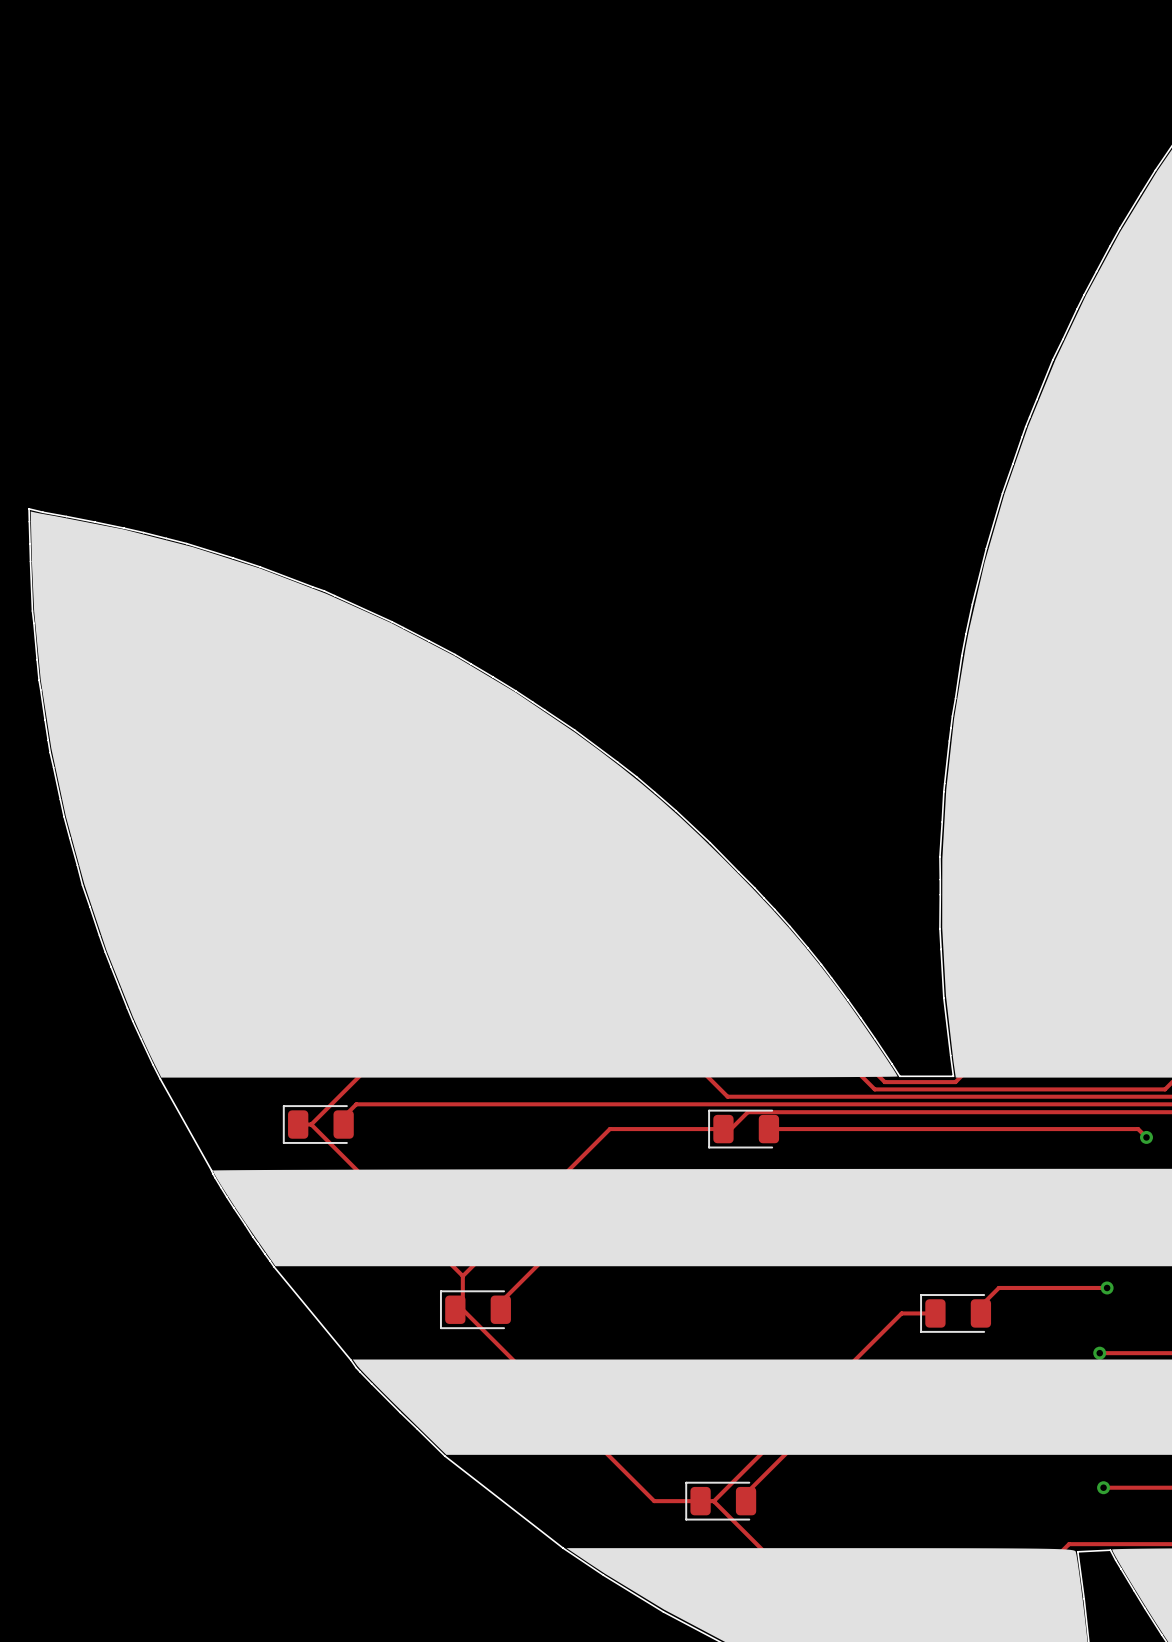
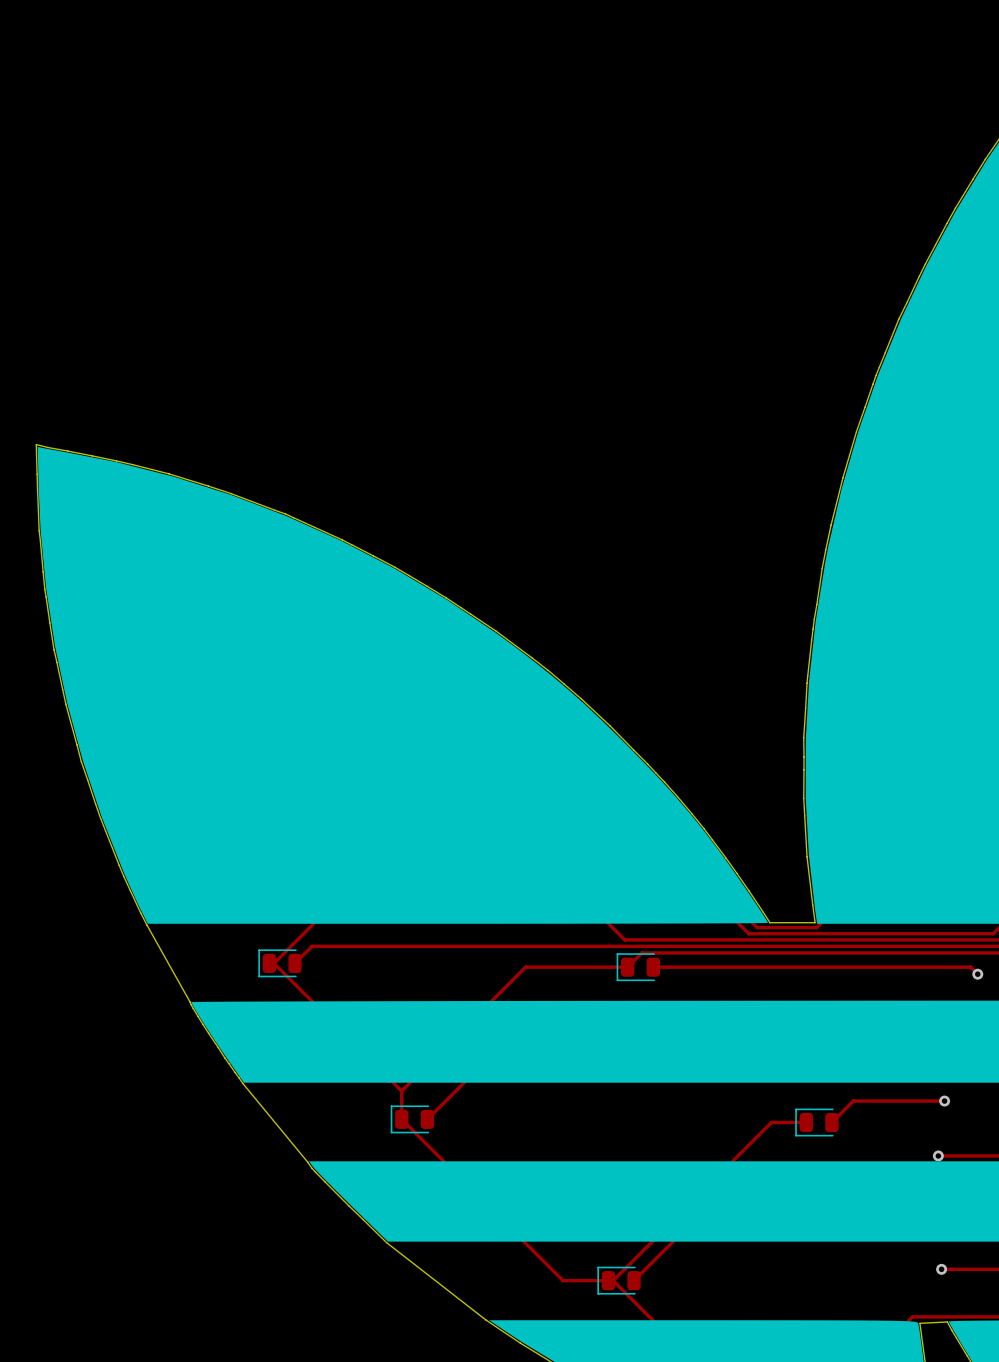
part footprint: [282, 1105, 354, 1144] -> [258, 949, 302, 978]
part footprint: [708, 1109, 780, 1149] -> [616, 953, 660, 982]
part footprint: [439, 1290, 511, 1330] -> [390, 1105, 435, 1134]
part footprint: [920, 1294, 992, 1333] -> [795, 1108, 839, 1137]
part footprint: [685, 1481, 757, 1521] -> [597, 1266, 641, 1295]

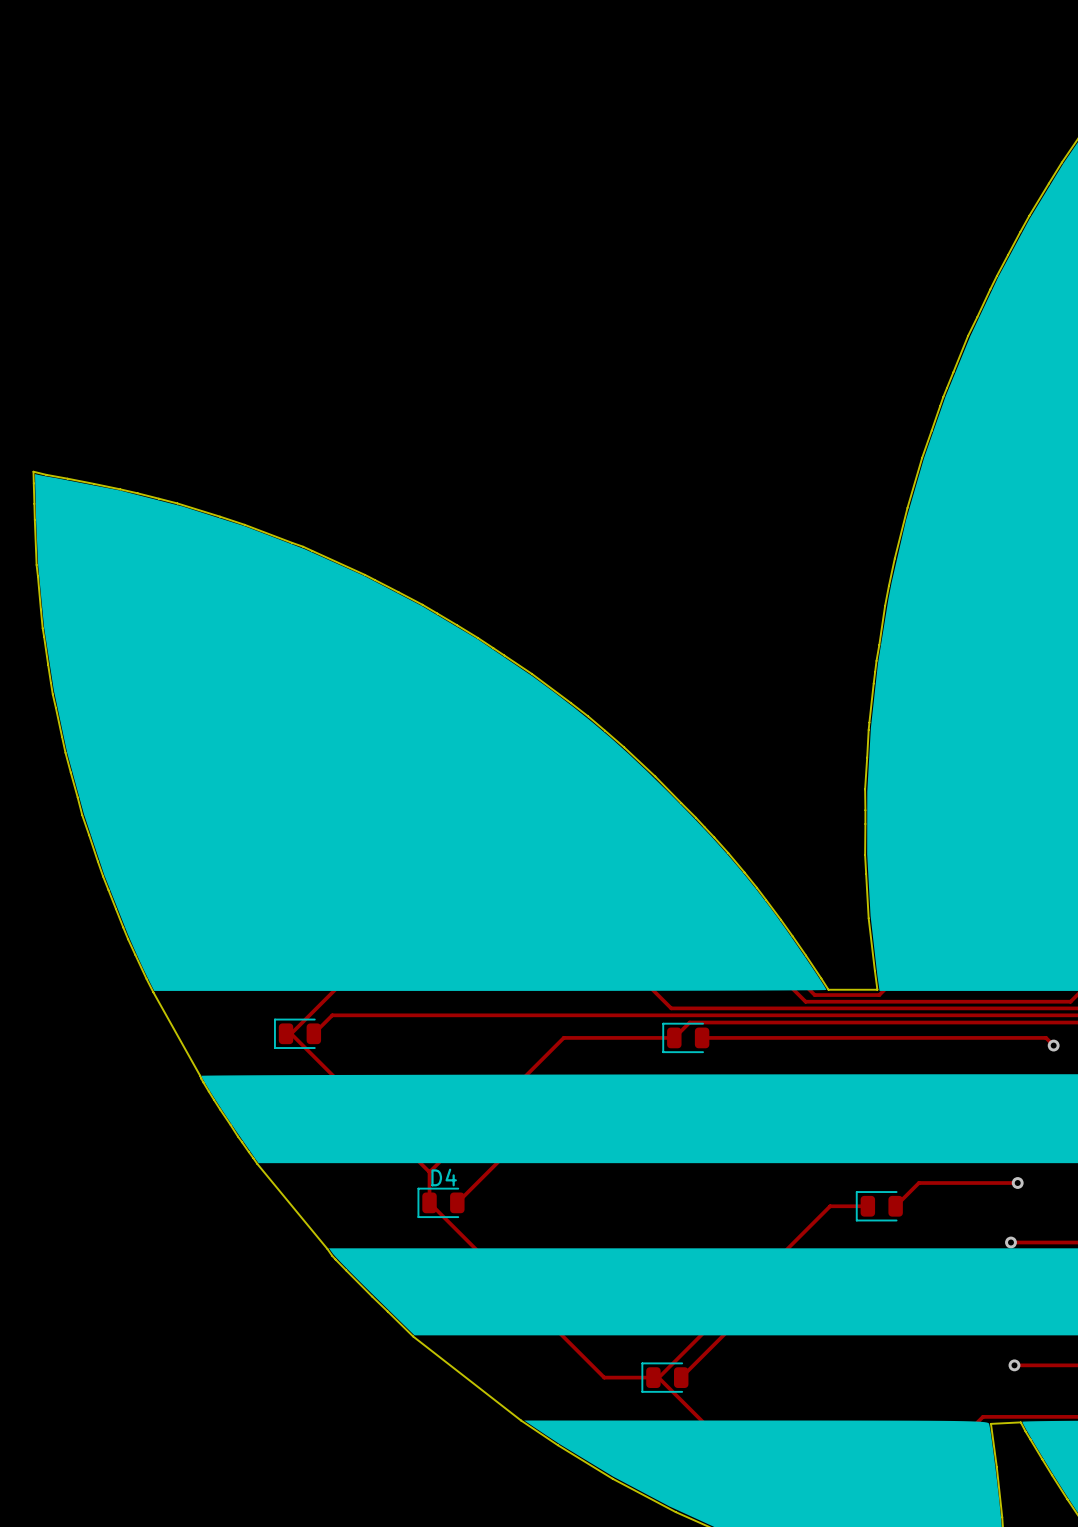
D4 name: none -> D4 (444, 1177)

